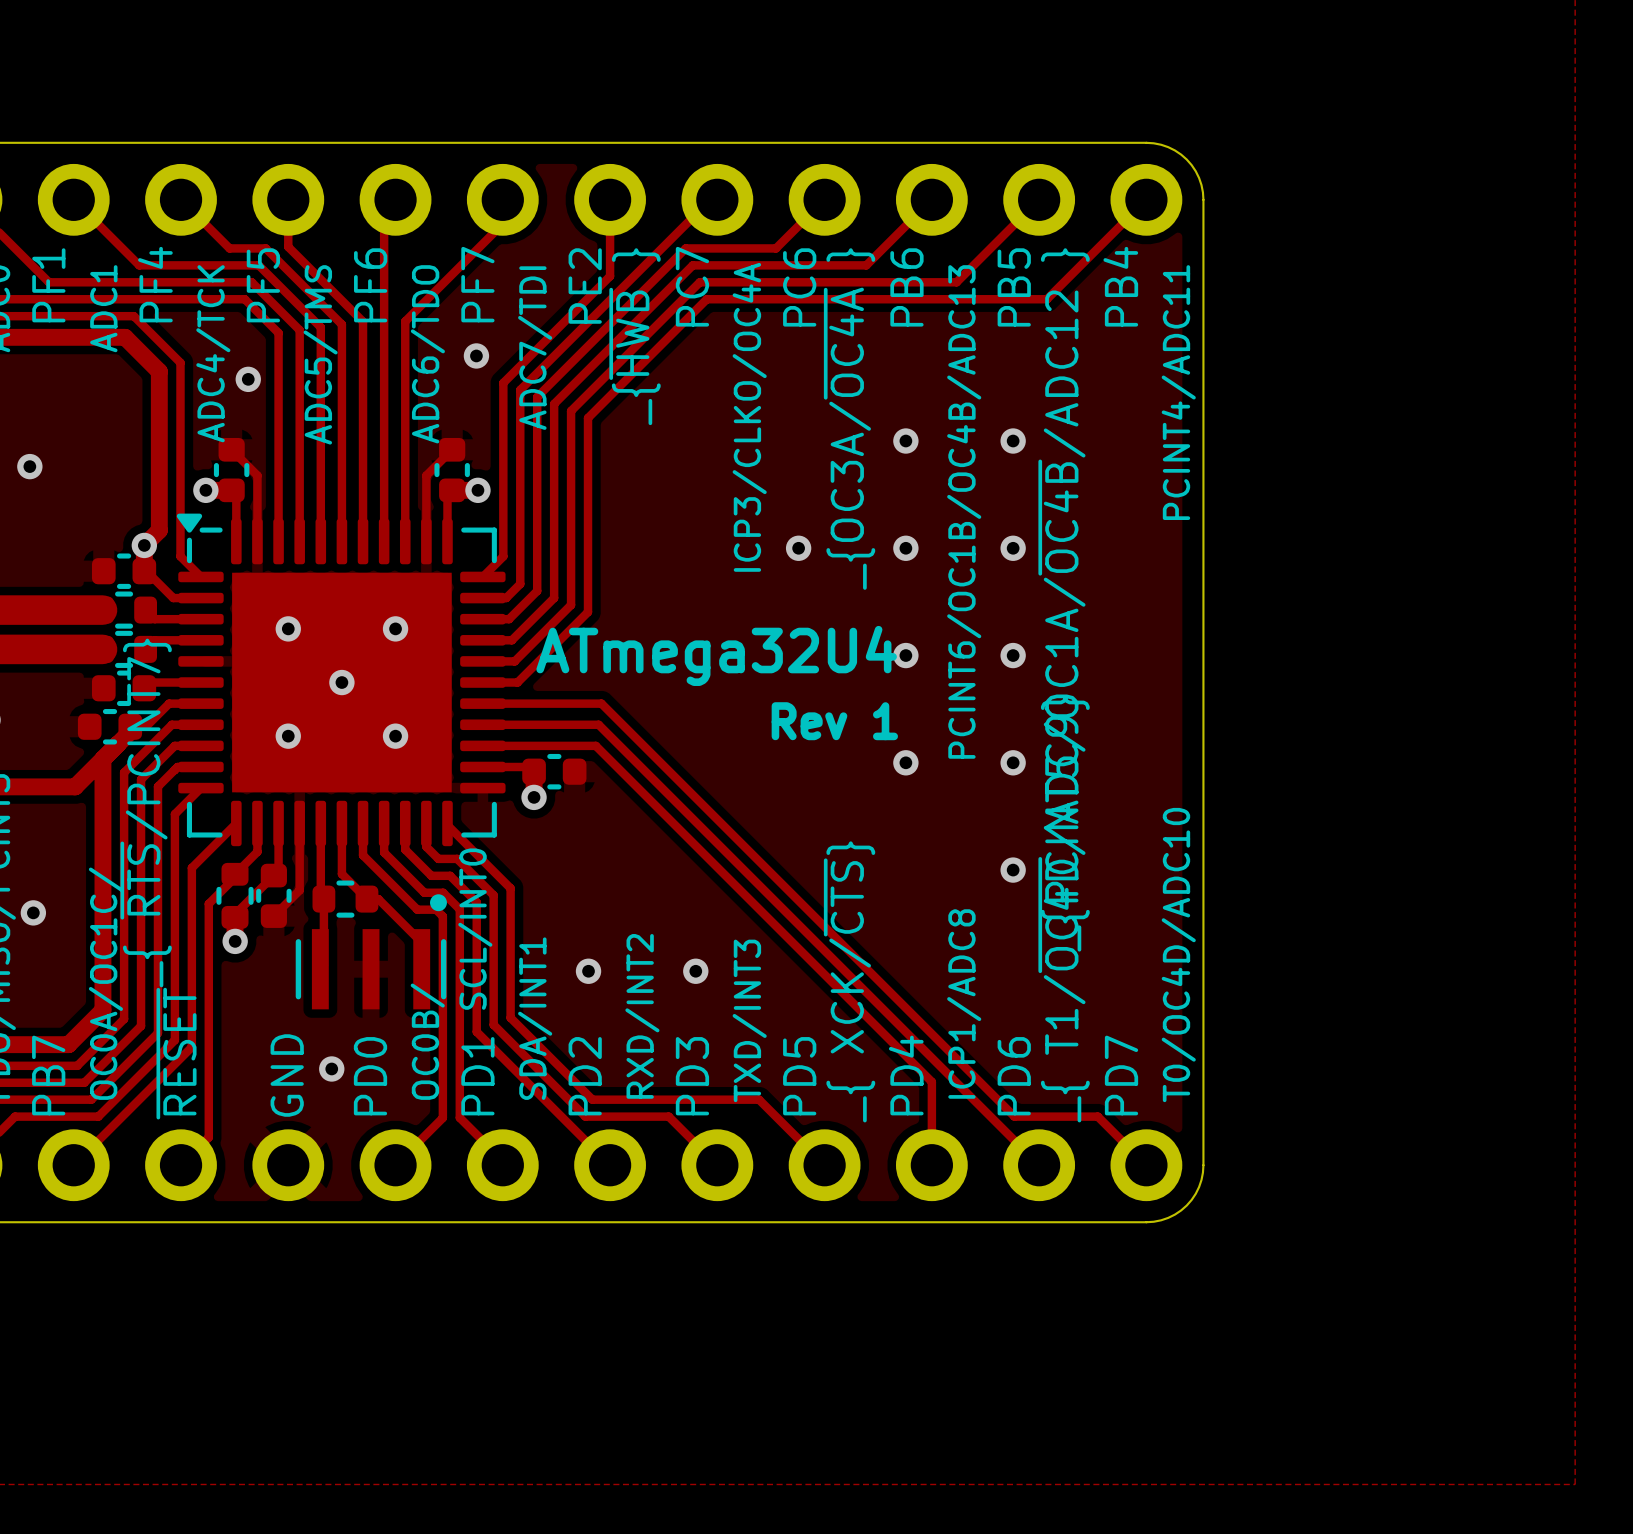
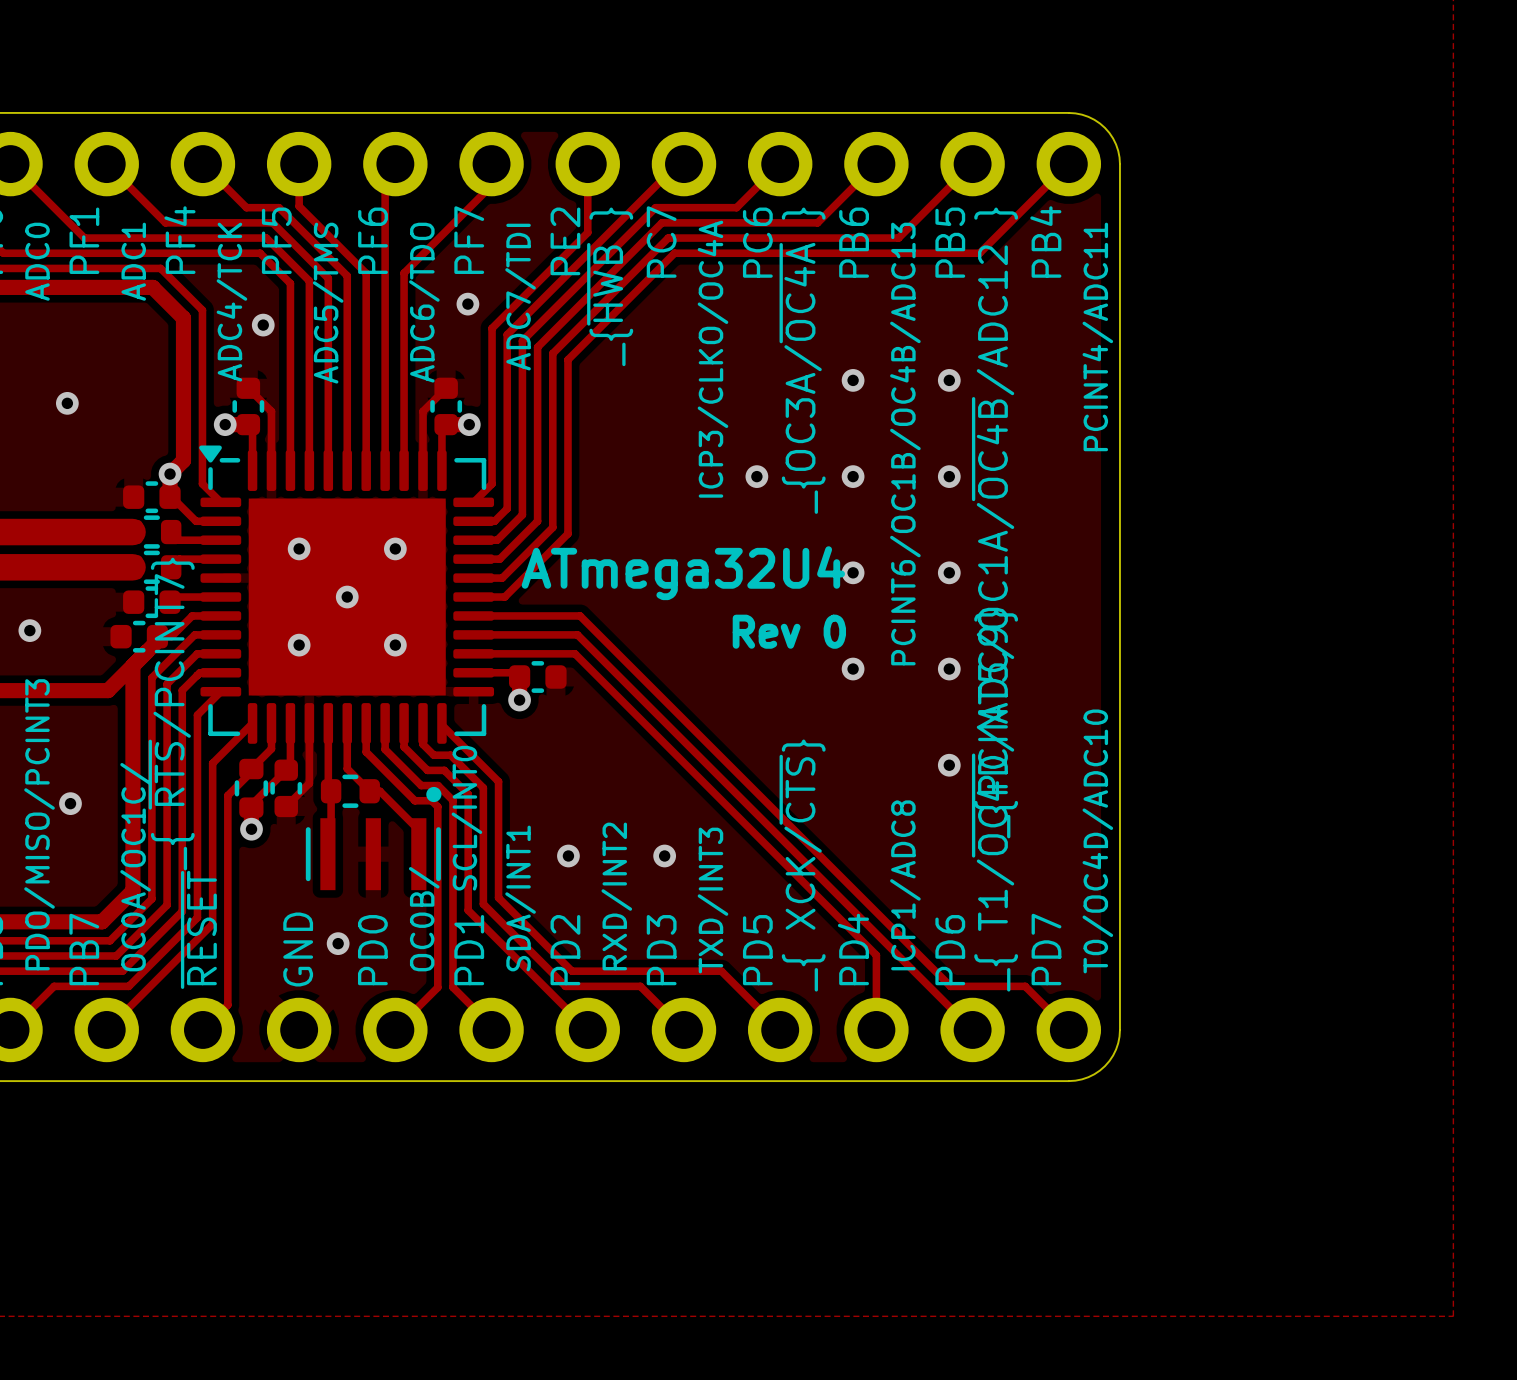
text: Rev 1 (834, 721) -> Rev 0 (789, 631)

